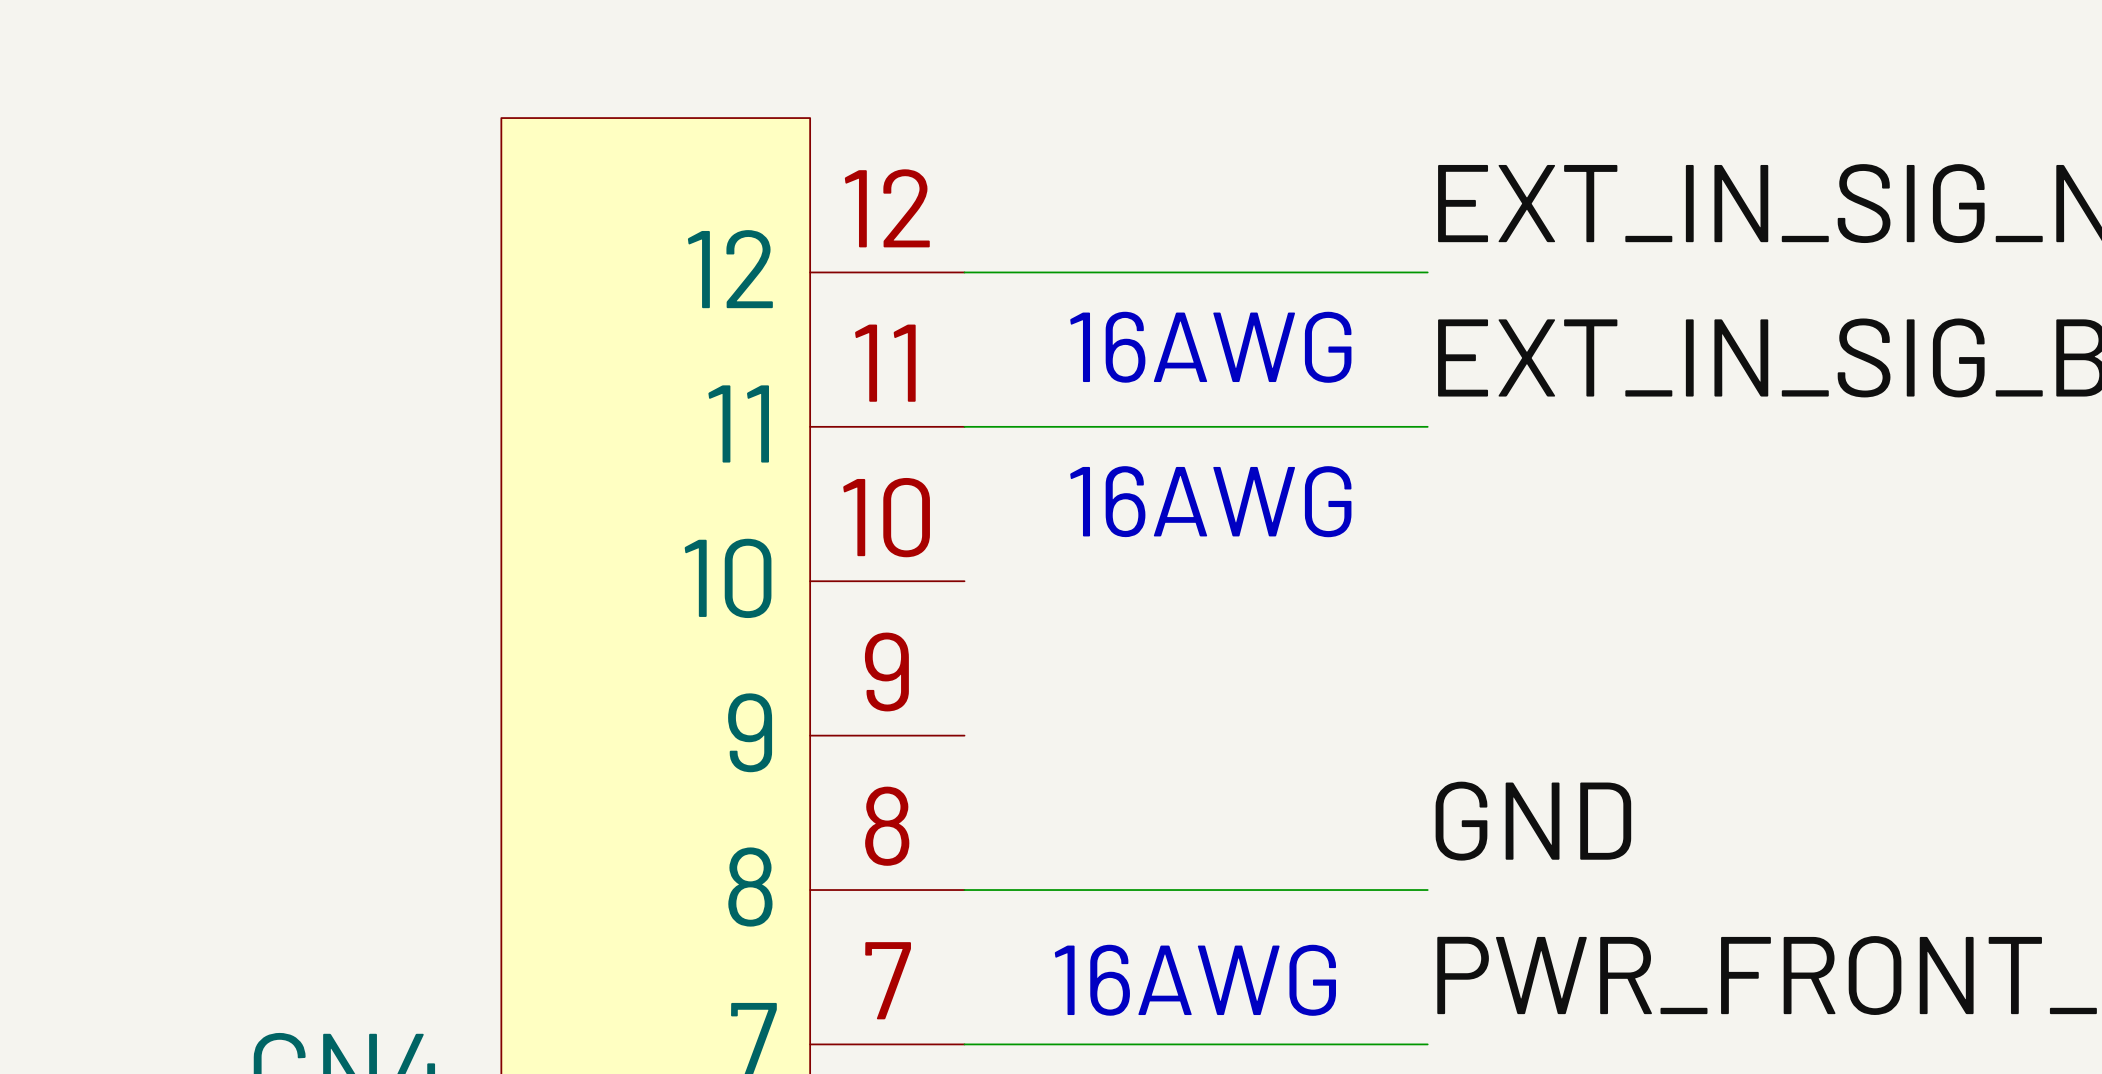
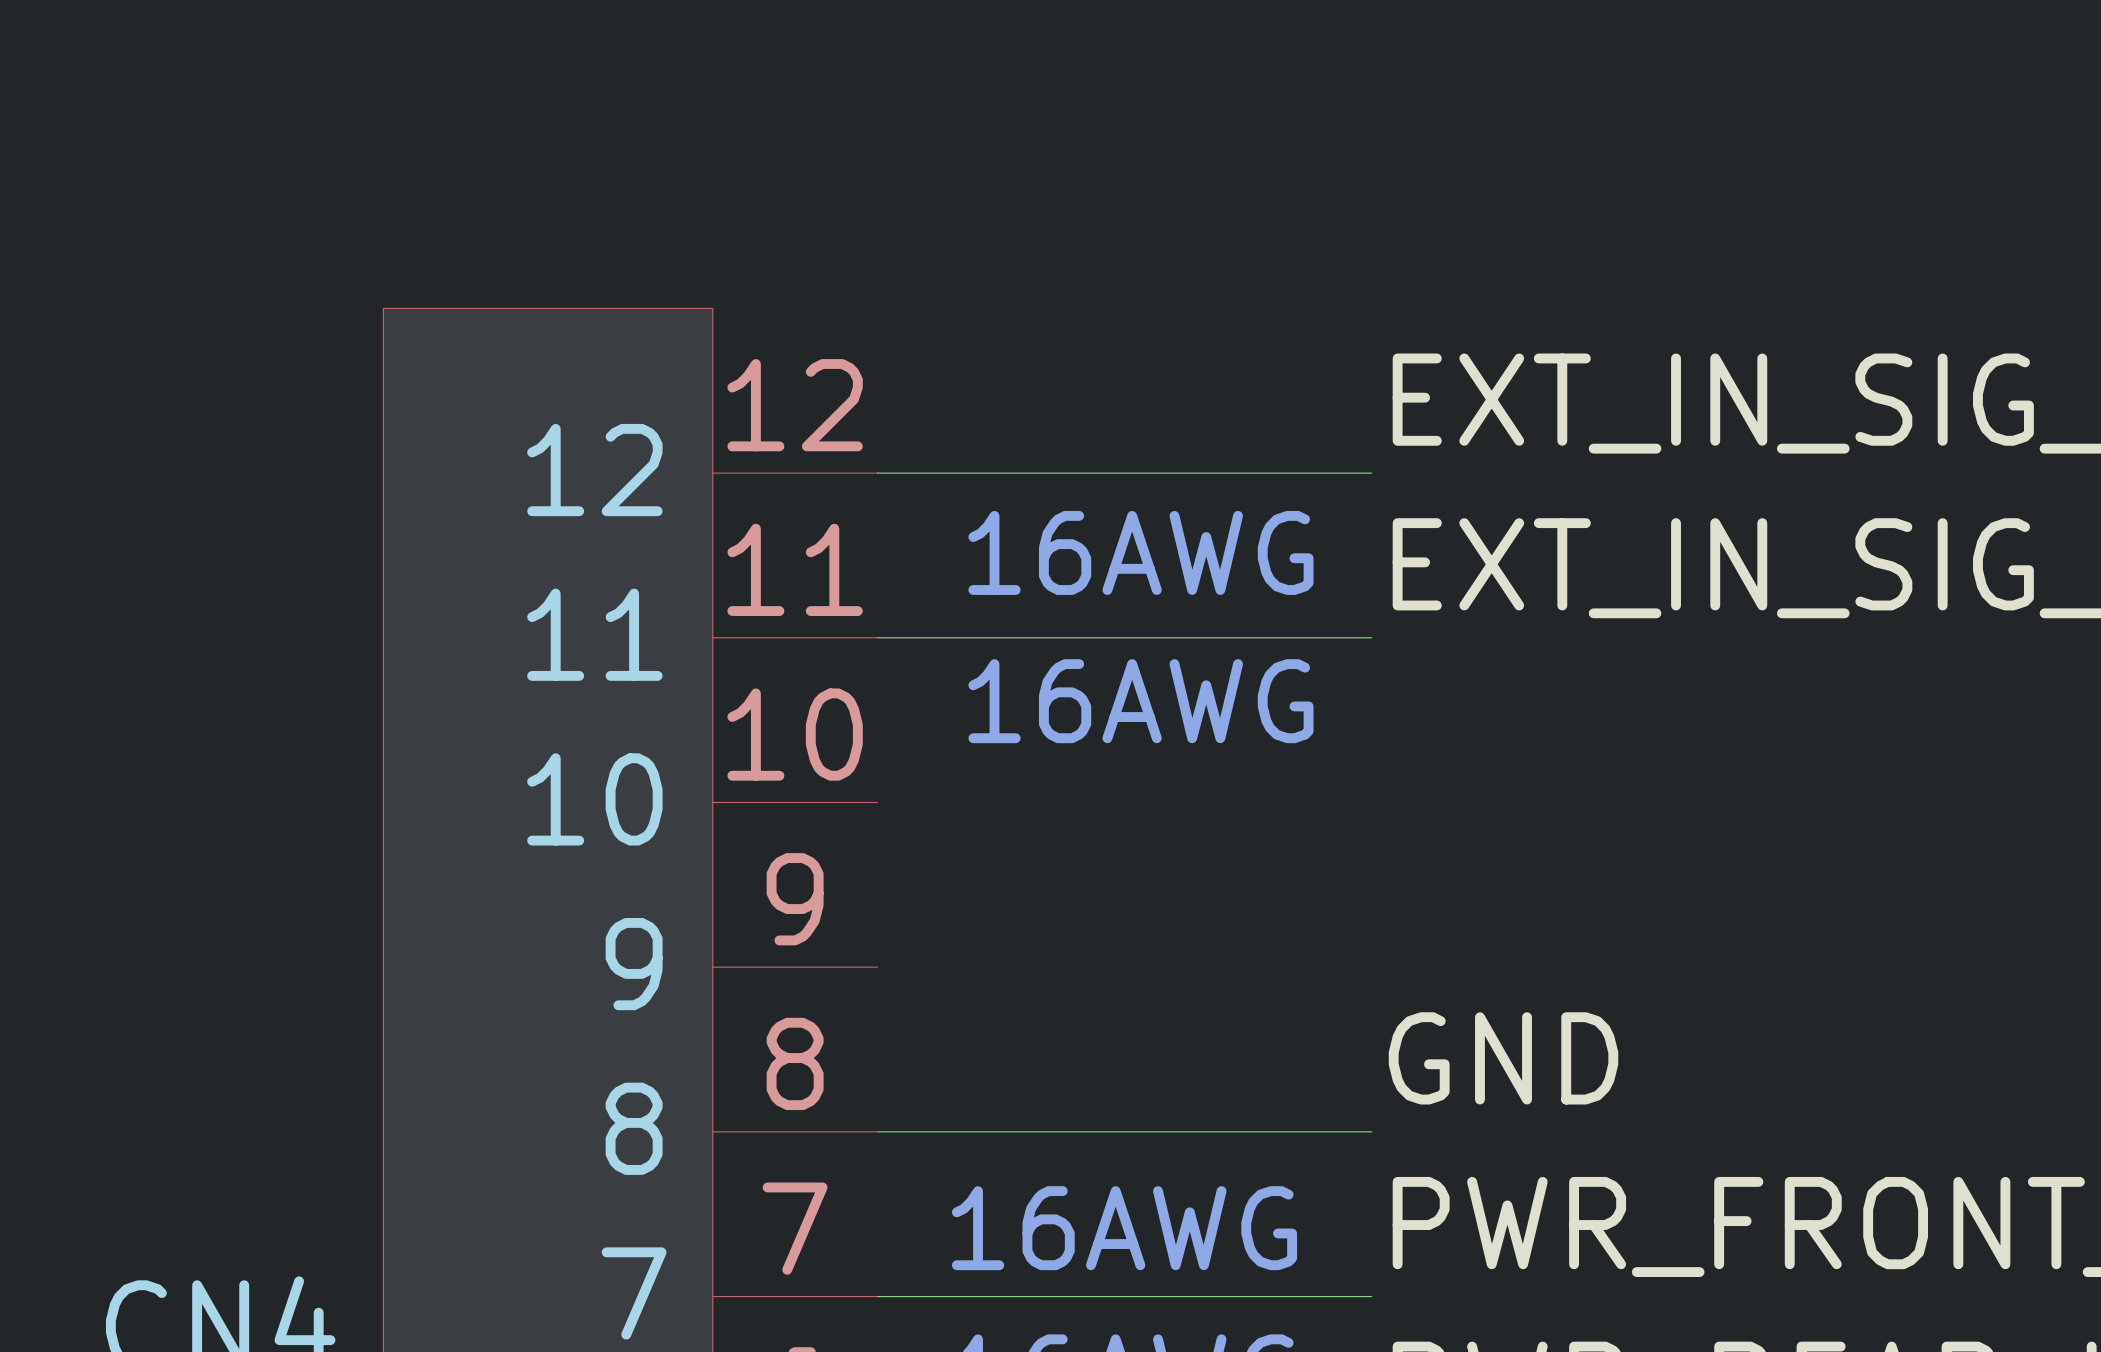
text position: 16AWG (1210, 501) -> 16AWG (1140, 701)

